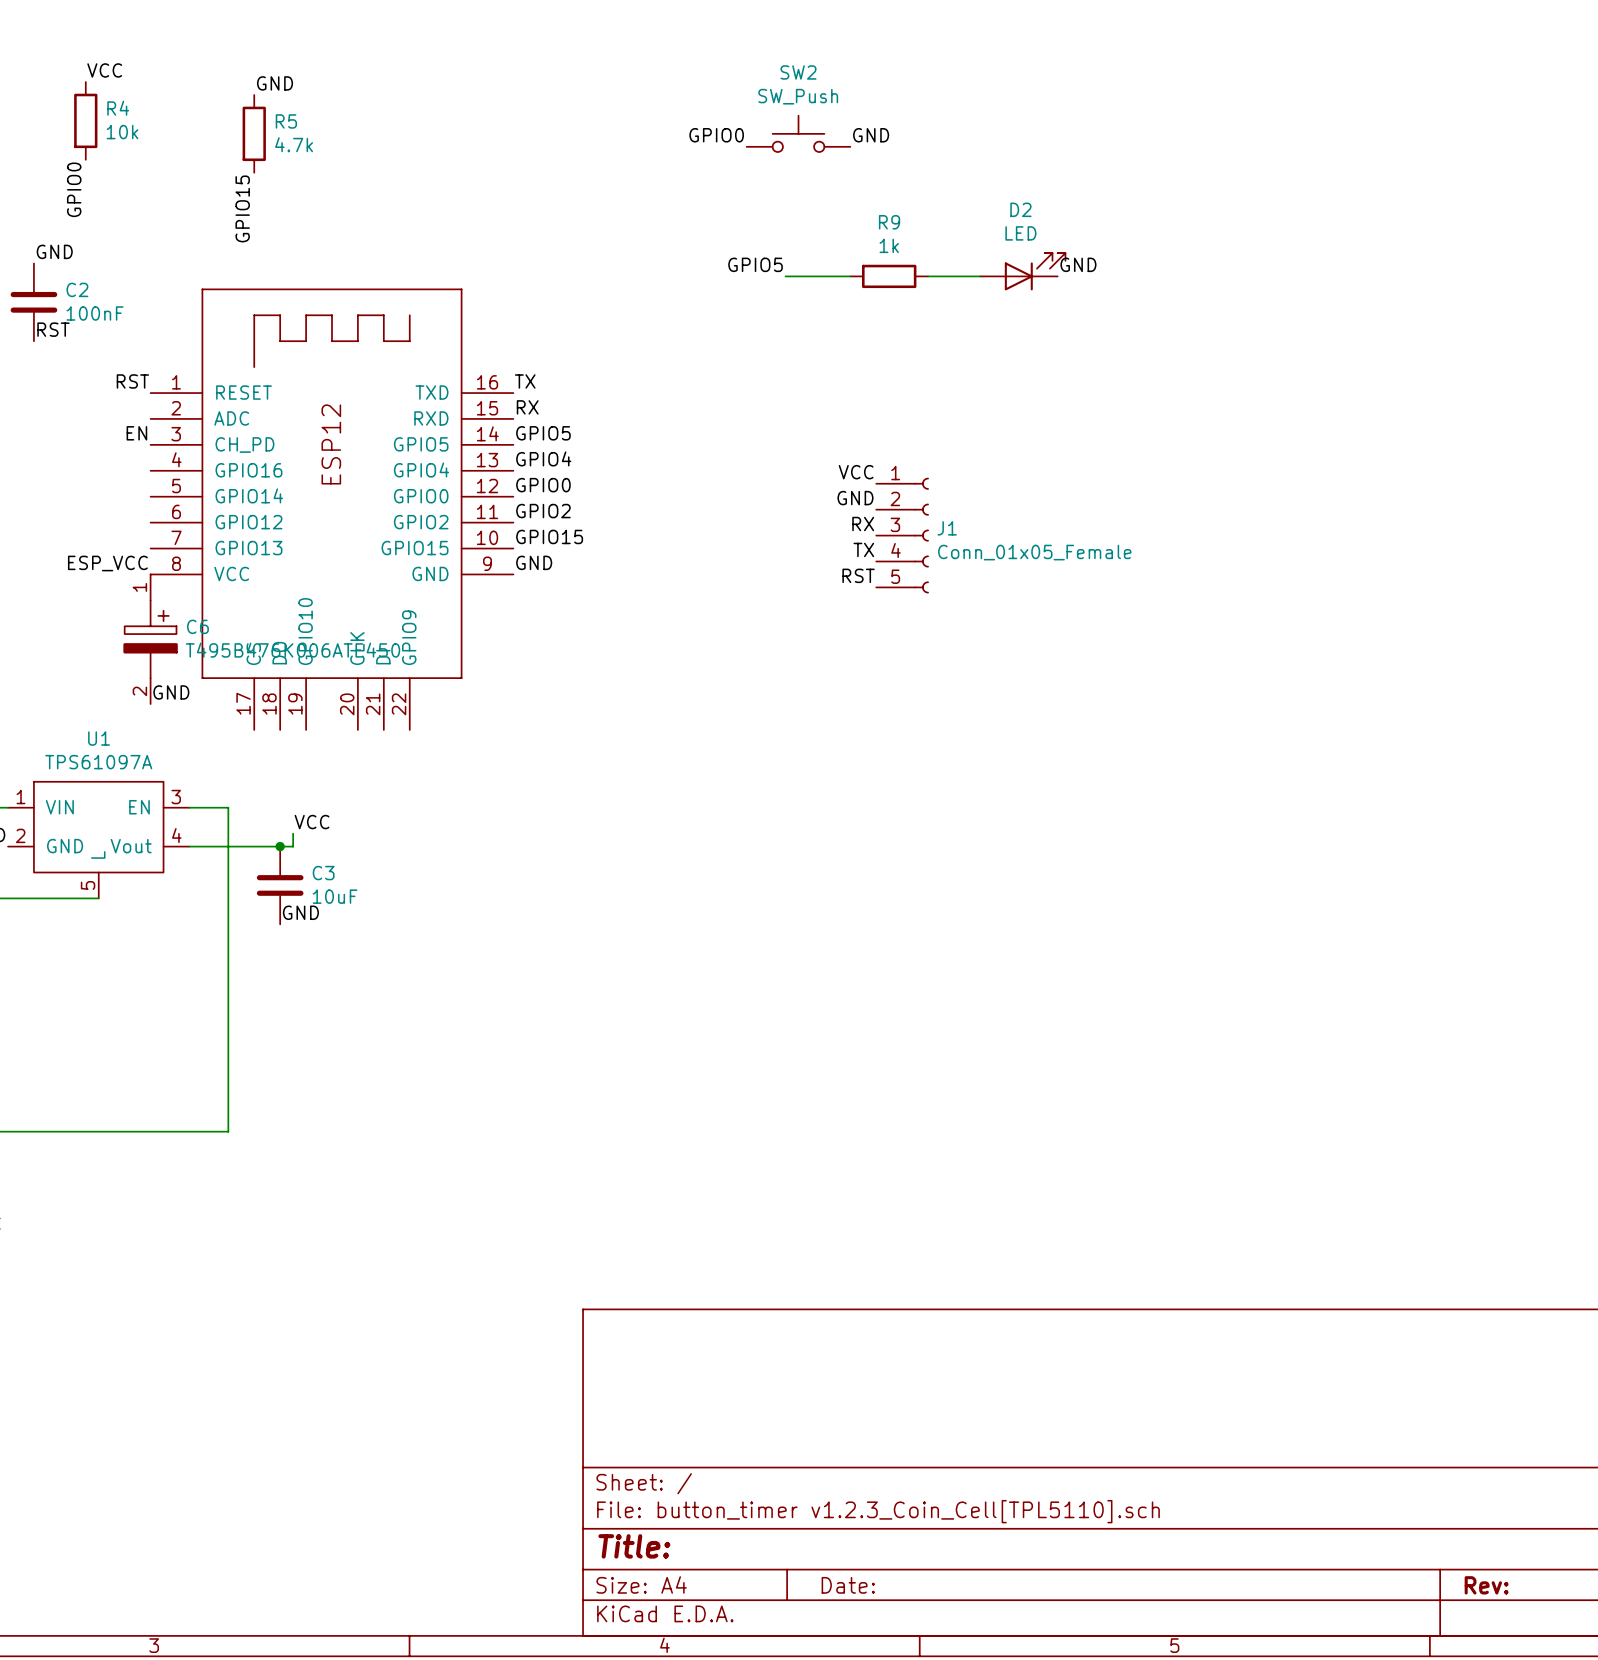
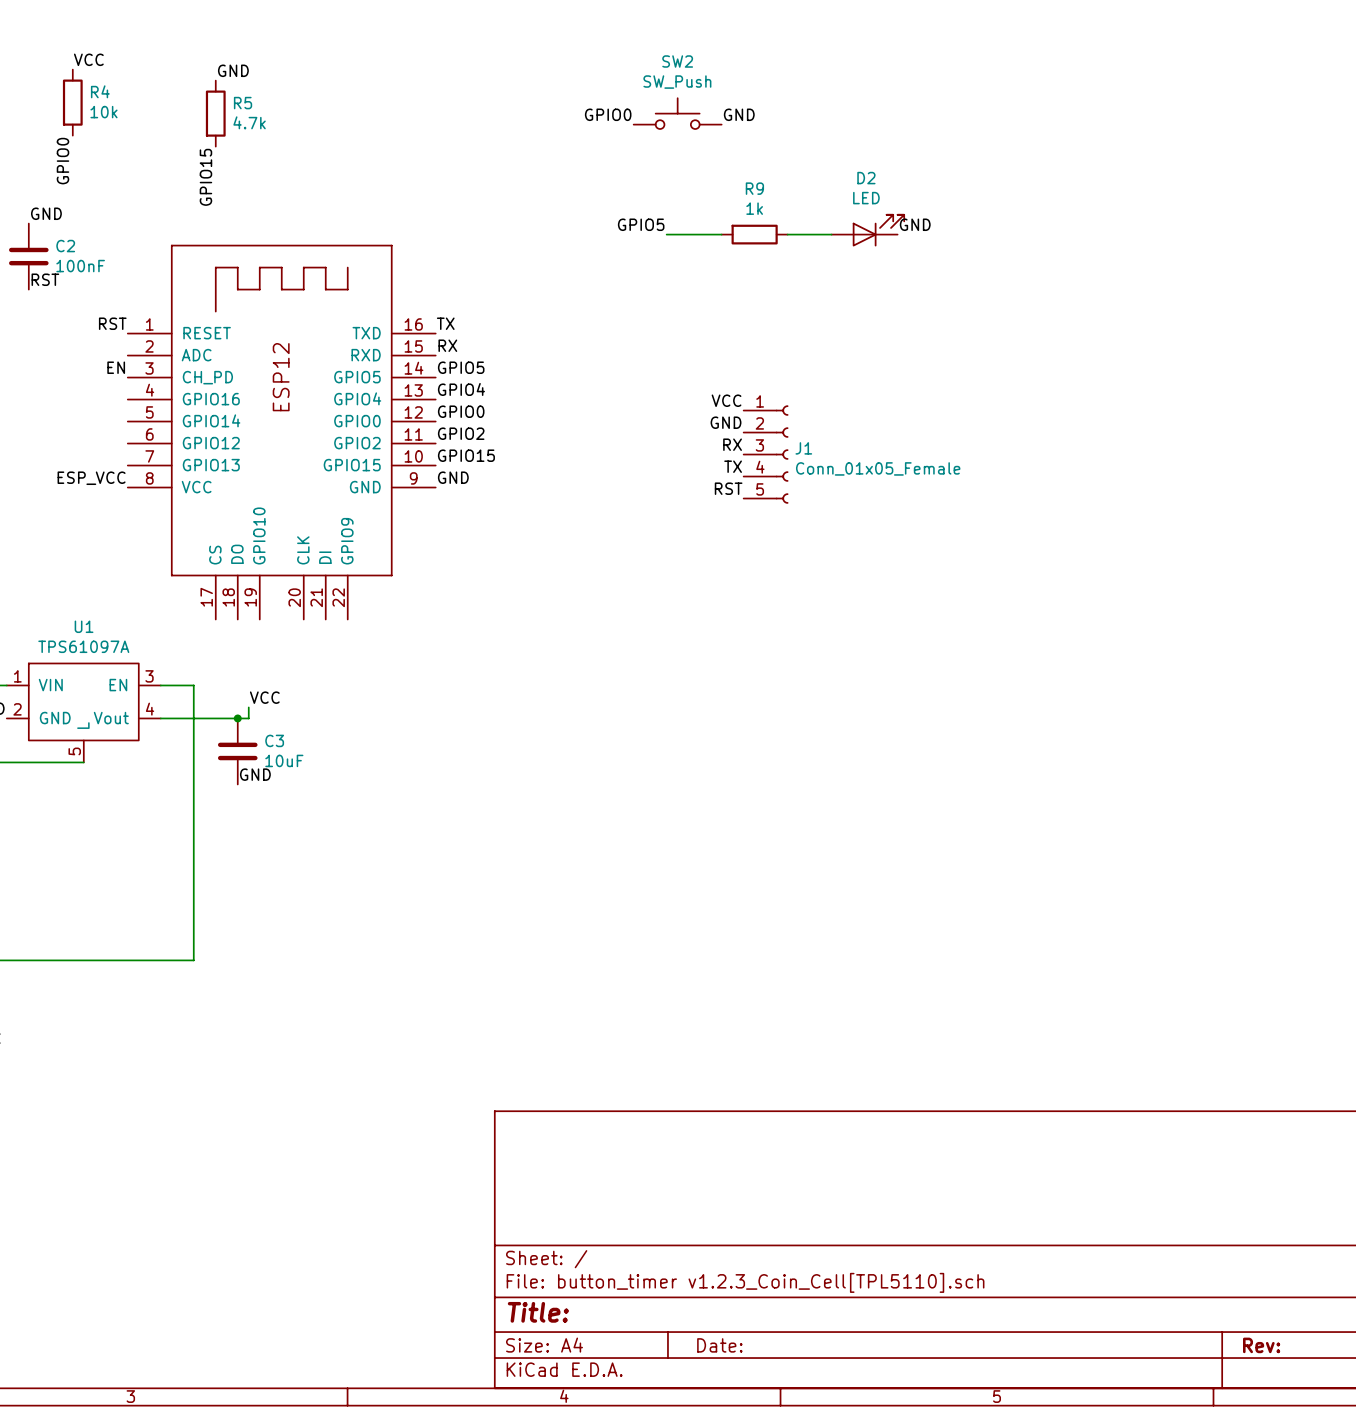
C6: T495B476K006ATE450 (150, 639) -> none
label: GND (171, 692) -> none

